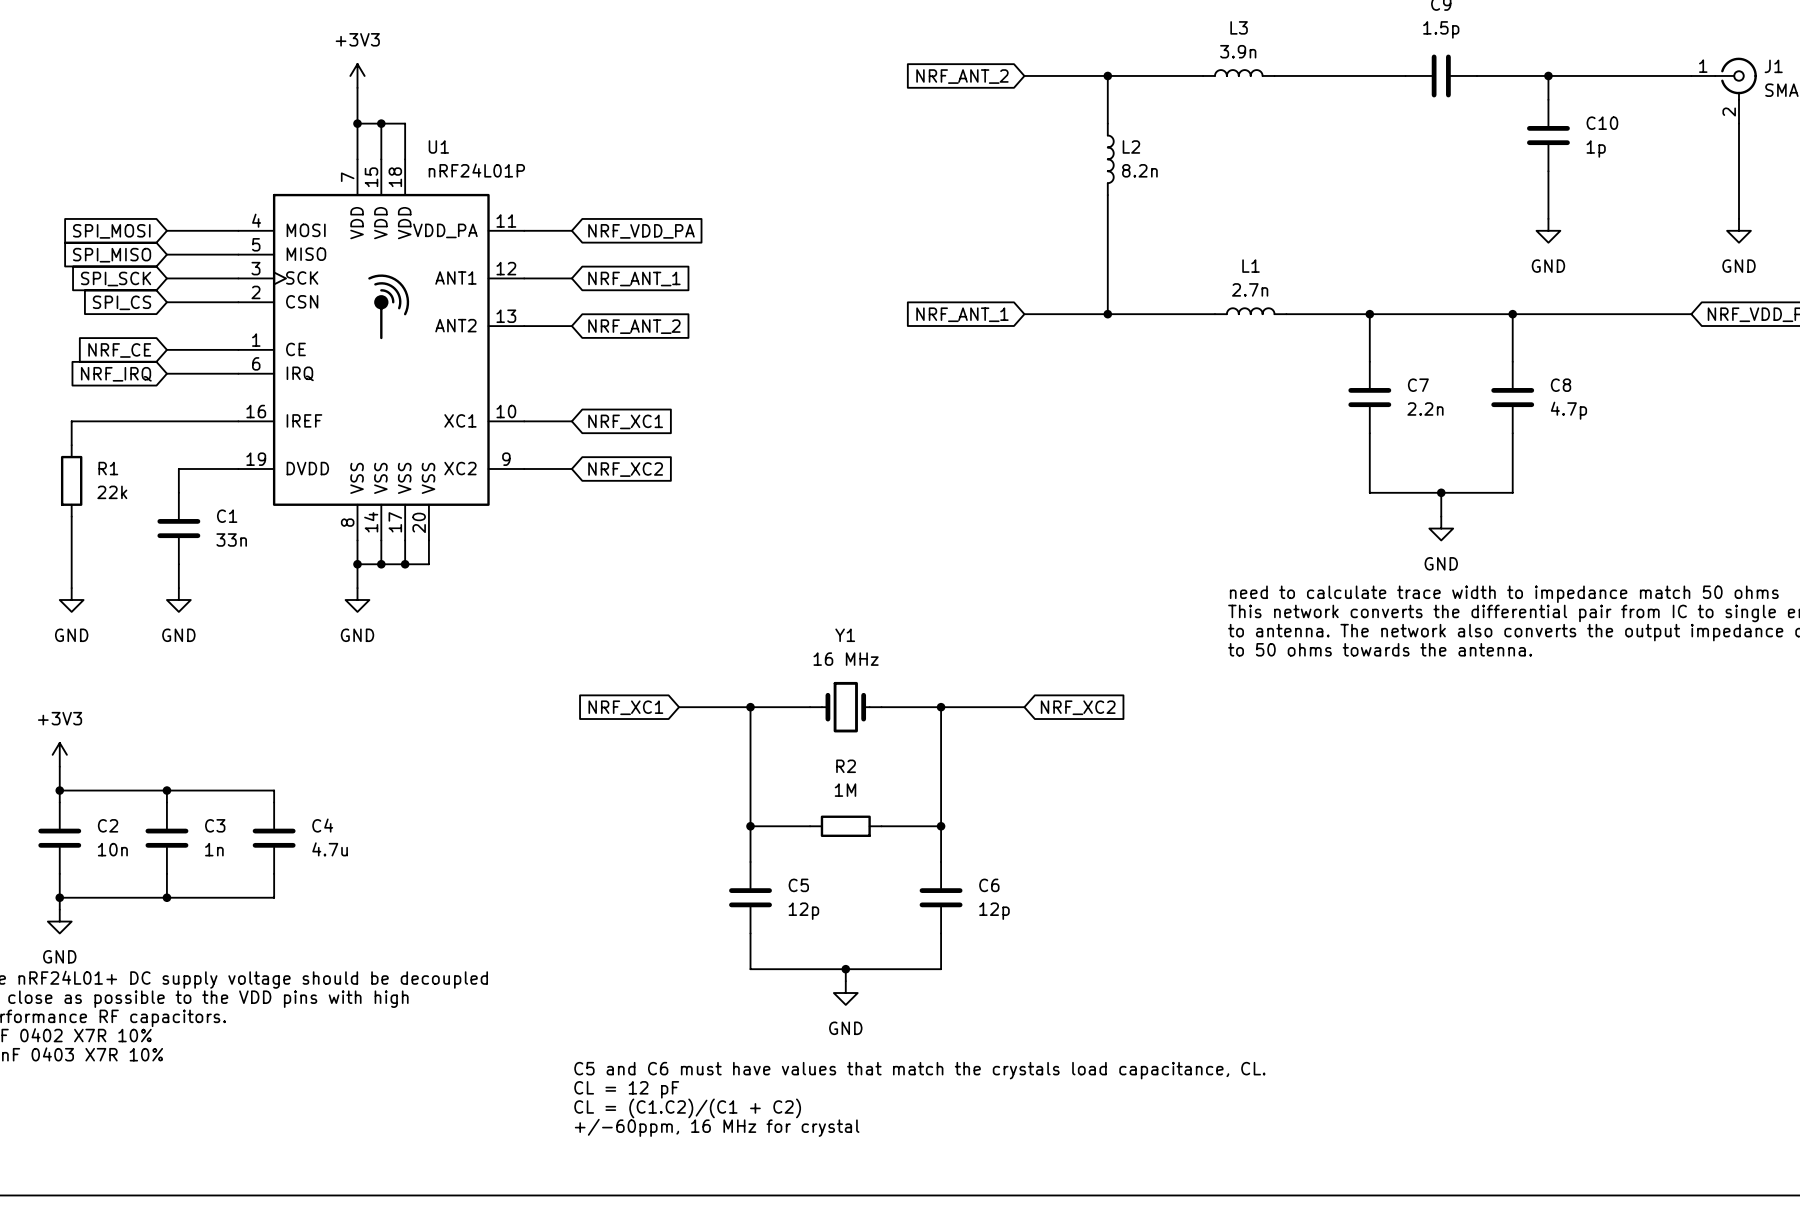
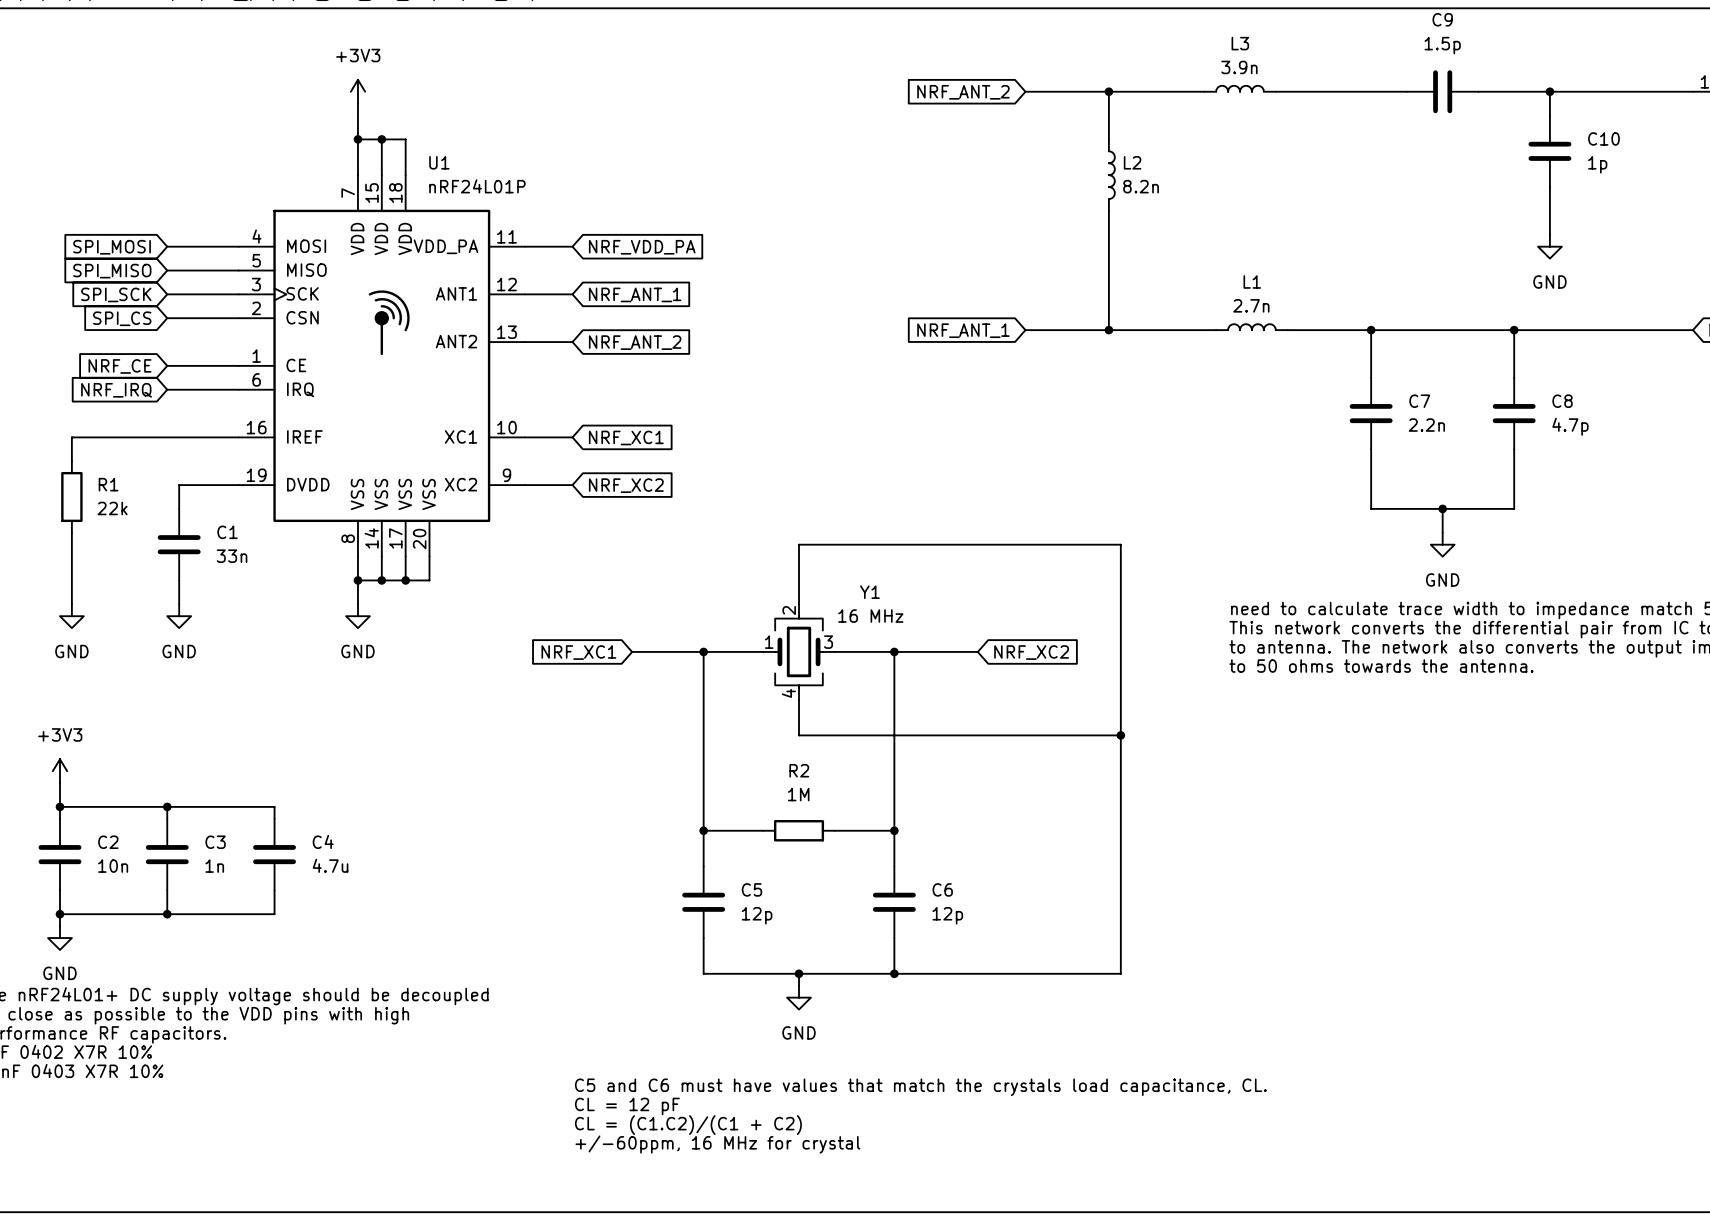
wire: none -> (799, 604) (799, 544) (1120, 544) (1120, 973) (703, 973) (703, 938)
wire: none -> (703, 651) (703, 866)
junction: none -> (703, 651)
Y1 name position: Y1 (845, 635) -> Y1 (869, 592)
wire: none -> (894, 651) (894, 866)
junction: none -> (894, 651)
Y1 value position: 16 MHz (846, 659) -> 16 MHz (870, 616)
Y1 symbol: [810, 681, 882, 733] -> [763, 604, 835, 700]
wire: none -> (799, 699) (799, 735) (1120, 735)
global label position: NRF_XC1 (625, 707) -> NRF_XC1 (578, 652)
wire: (679, 707) (810, 707) -> (632, 651) (763, 651)
wire: (750, 707) (750, 862) -> none
junction: (750, 707) -> none
wire: (881, 707) (1024, 707) -> (834, 651) (977, 651)
wire: (941, 707) (941, 862) -> none
junction: (941, 707) -> none
global label position: NRF_XC2 (1078, 707) -> NRF_XC2 (1031, 652)
junction: none -> (1120, 735)
wire: (750, 826) (810, 826) -> (703, 830) (763, 830)
junction position: (750, 826) -> (703, 830)
R2 position: (845, 826) -> (799, 830)
wire: (881, 826) (941, 826) -> (834, 830) (894, 830)
junction position: (941, 826) -> (894, 830)
C5 position: (750, 897) -> (703, 902)
C6 position: (941, 897) -> (894, 902)
wire: none -> (894, 938) (894, 973)
wire: (750, 933) (750, 969) (941, 969) (941, 933) -> none
junction: none -> (799, 973)
junction: none -> (894, 973)
wire: (845, 969) (845, 981) -> (799, 973) (799, 985)
junction: (845, 969) -> none
power symbol position: GND (845, 993) -> GND (799, 997)

